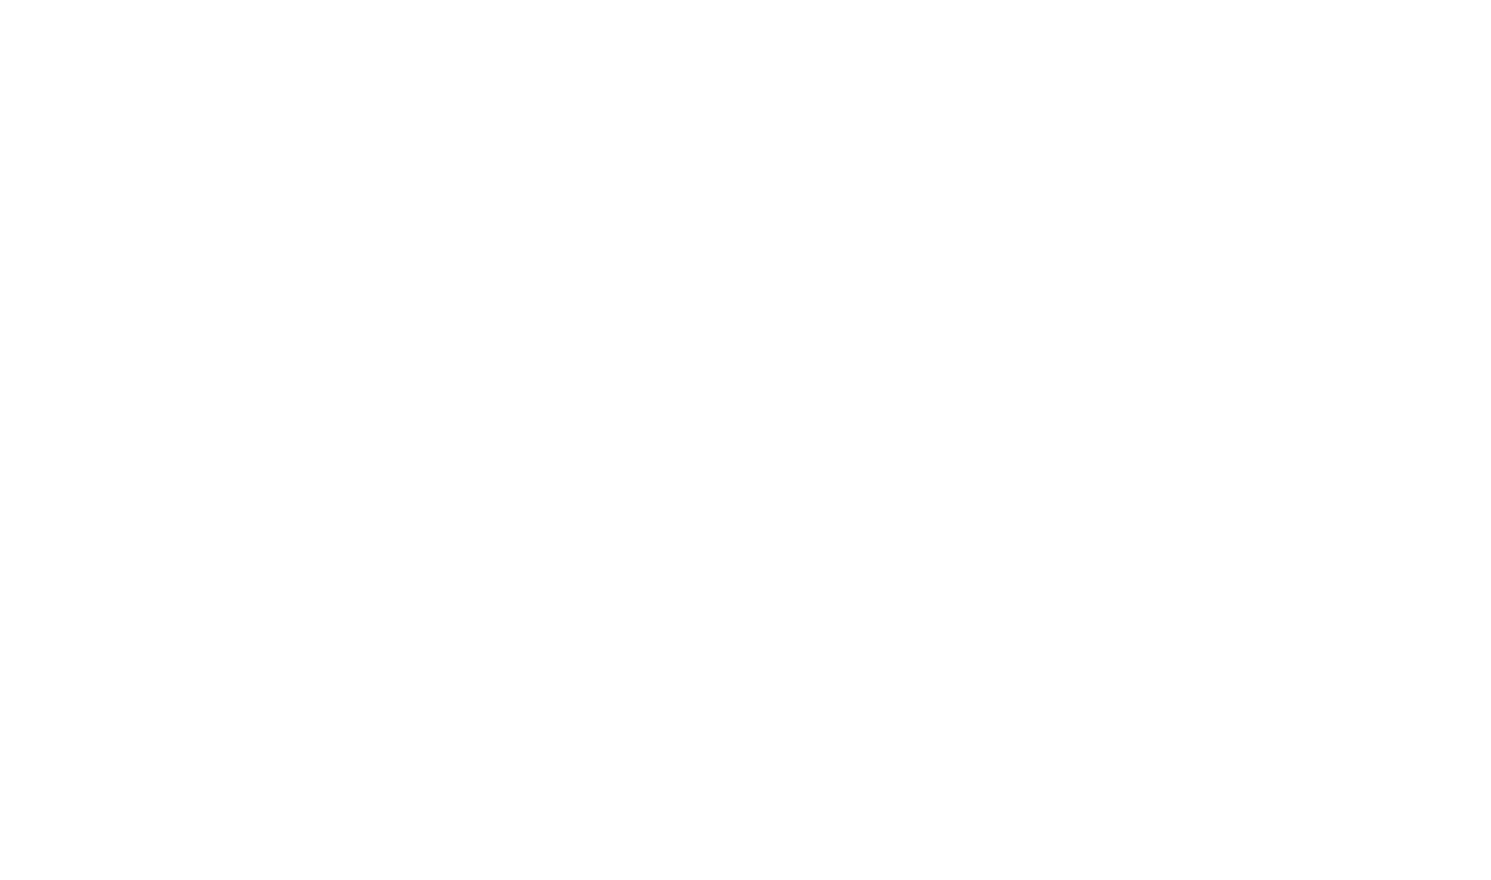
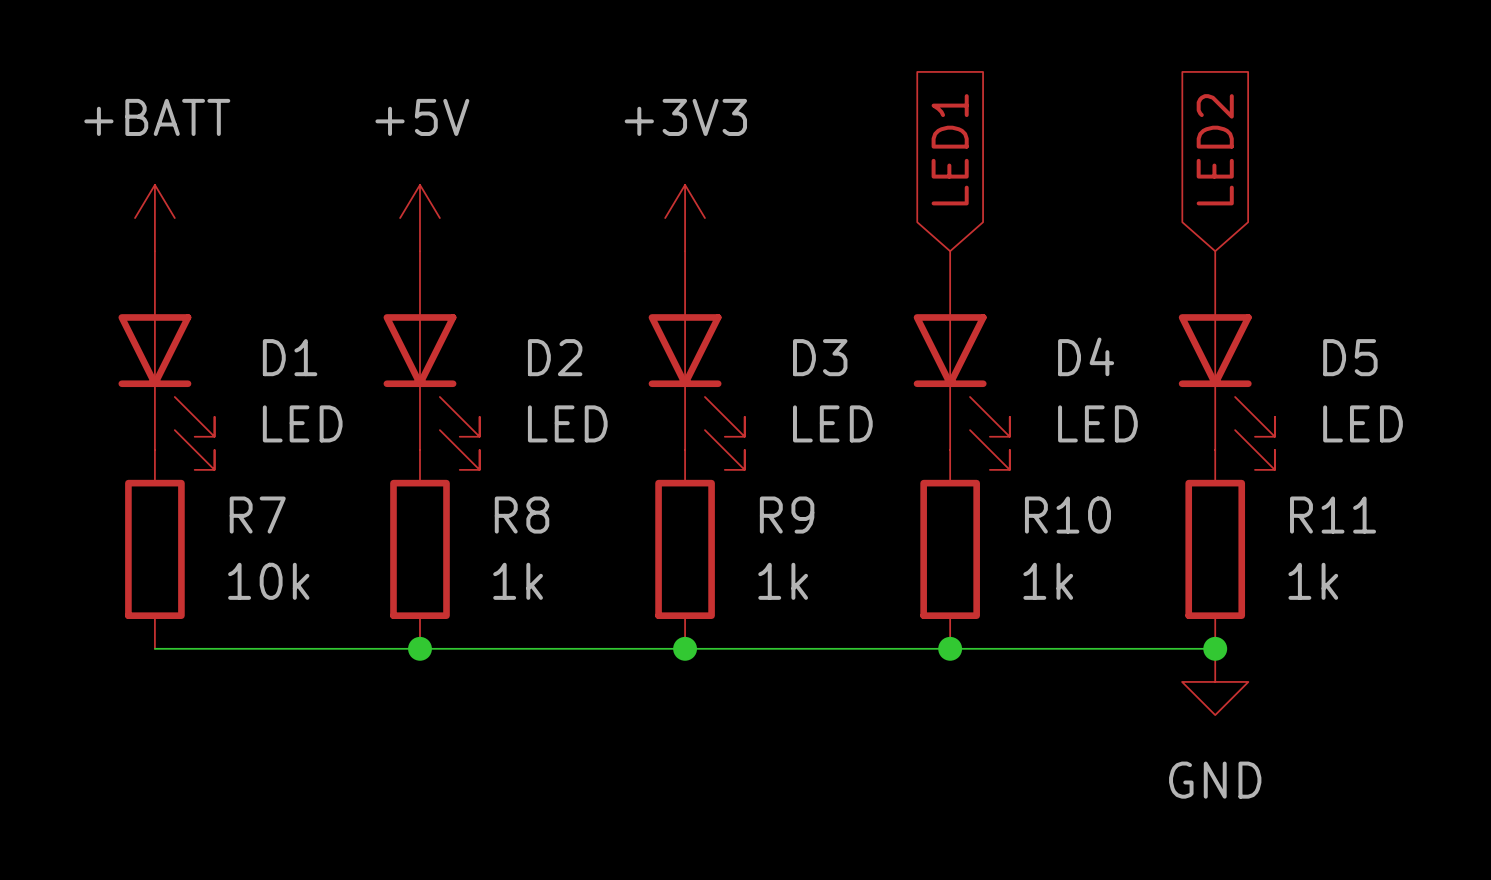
global label: none -> LED1 (950, 149)
global label: none -> LED2 (1215, 149)
power symbol: none -> +BATT (154, 218)
power symbol: none -> +5V (419, 218)
power symbol: none -> +3V3 (685, 218)
D1: none -> LED (166, 360)
D2: none -> LED (431, 360)
D3: none -> LED (696, 360)
D4: none -> LED (961, 360)
D5: none -> LED (1226, 360)
R7: none -> 10k (154, 549)
R8: none -> 1k (419, 549)
R9: none -> 1k (685, 549)
R10: none -> 1k (950, 549)
R11: none -> 1k (1215, 549)
wire: none -> (154, 648) (1215, 648)
junction: none -> (419, 648)
junction: none -> (685, 648)
junction: none -> (950, 648)
junction: none -> (1215, 648)
power symbol: none -> GND (1215, 681)

